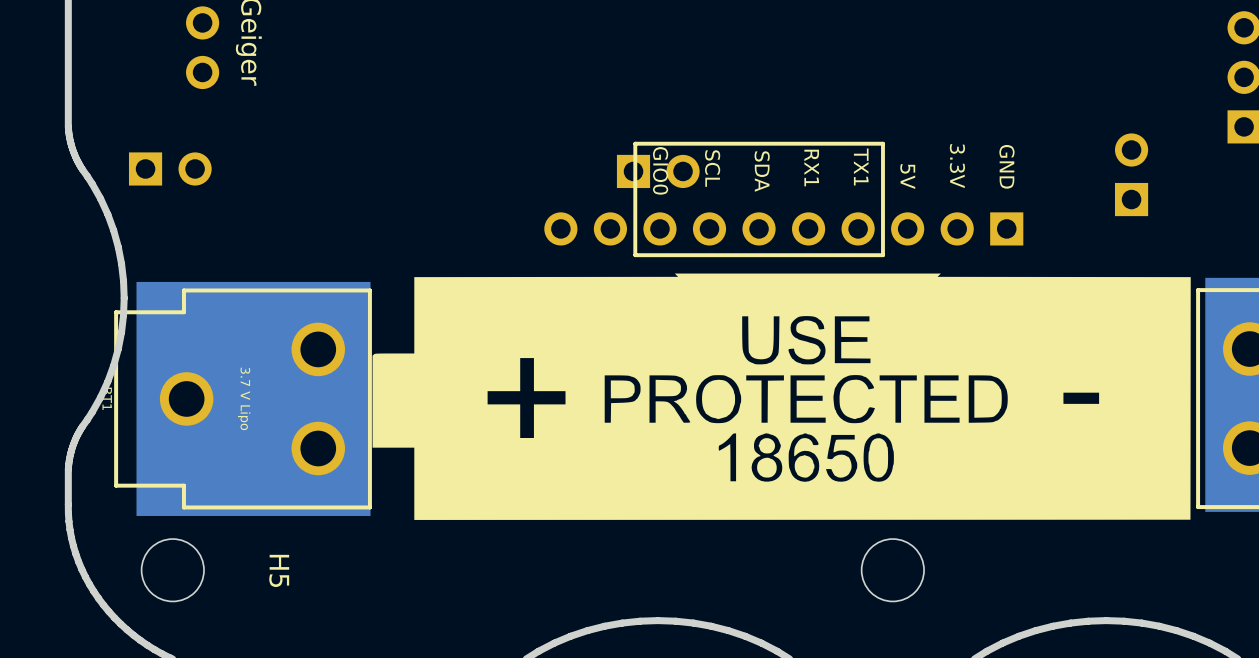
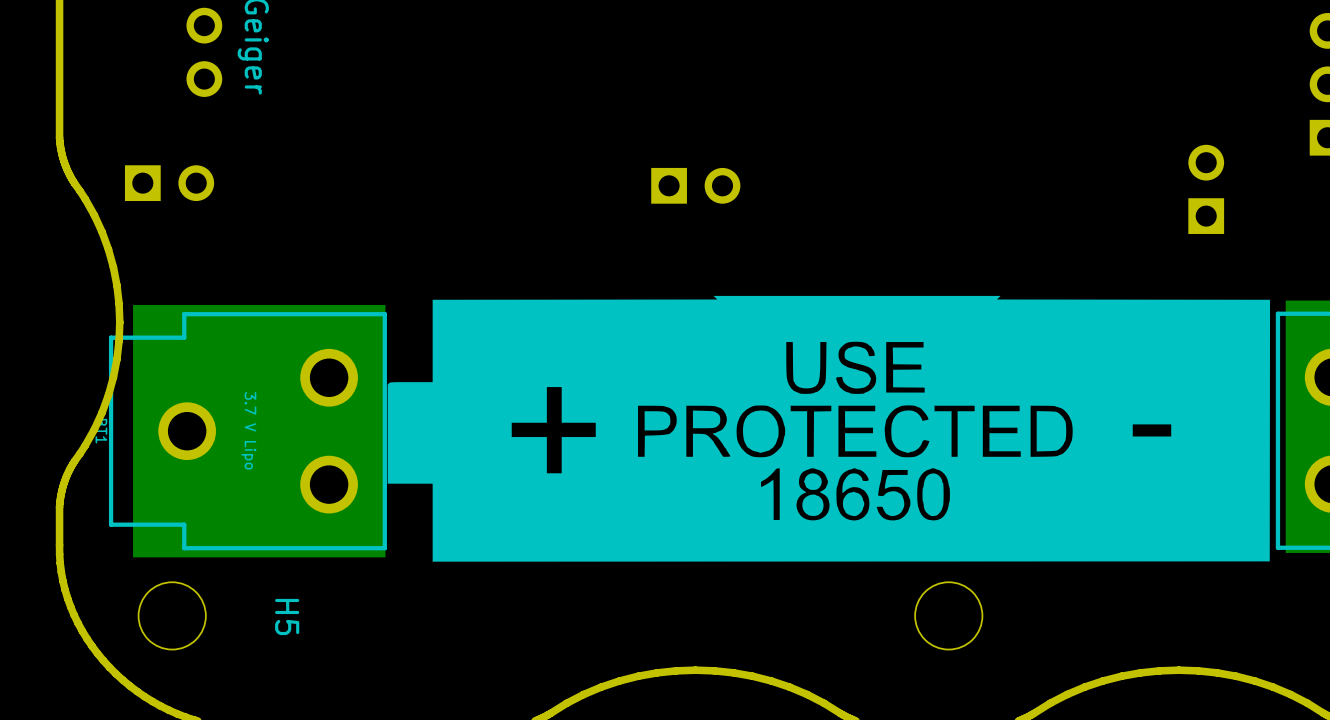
line: (882, 143) (882, 255) (635, 255) (635, 143) (882, 143) -> none
text: TX1 (861, 166) -> none
text: 3.3V (957, 166) -> none
text: GND (1006, 166) -> none
text: SCL (712, 168) -> none
text: RX1 (811, 168) -> none
text: GIO0 (660, 170) -> none
text: SDA (762, 171) -> none
text: 5V (907, 176) -> none
part: (783, 228) -> none

